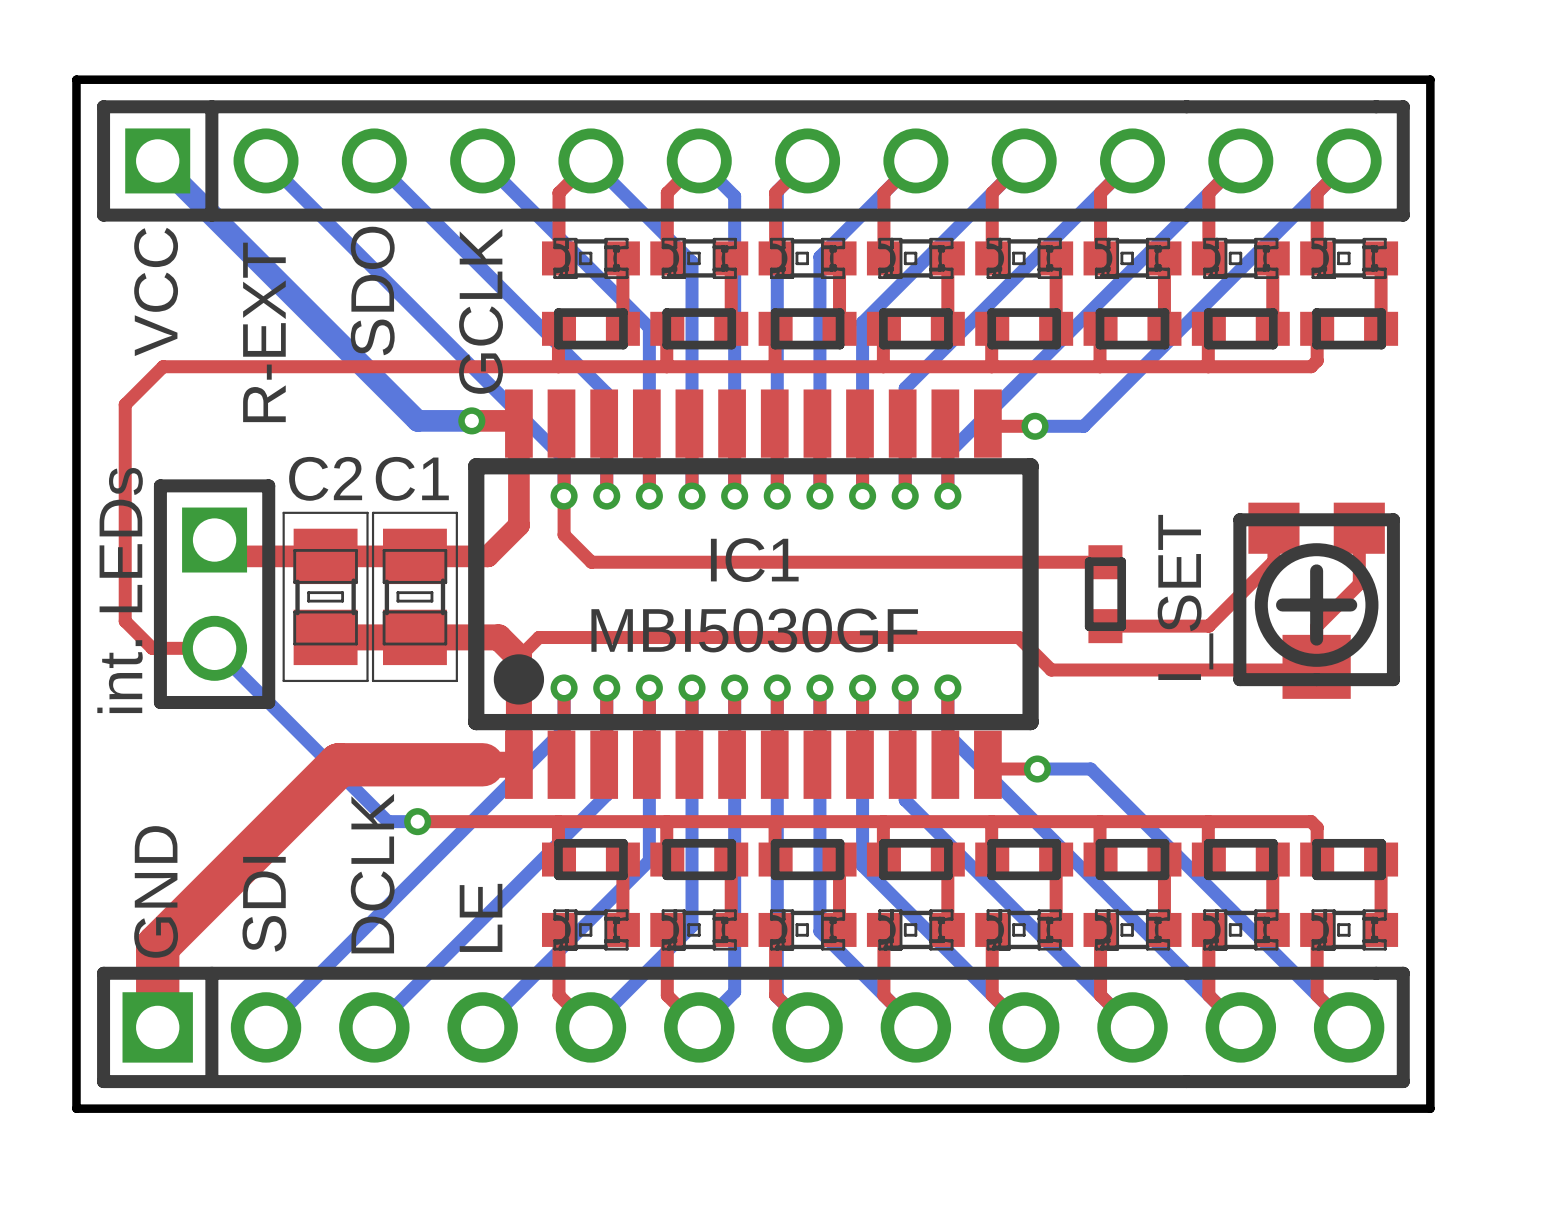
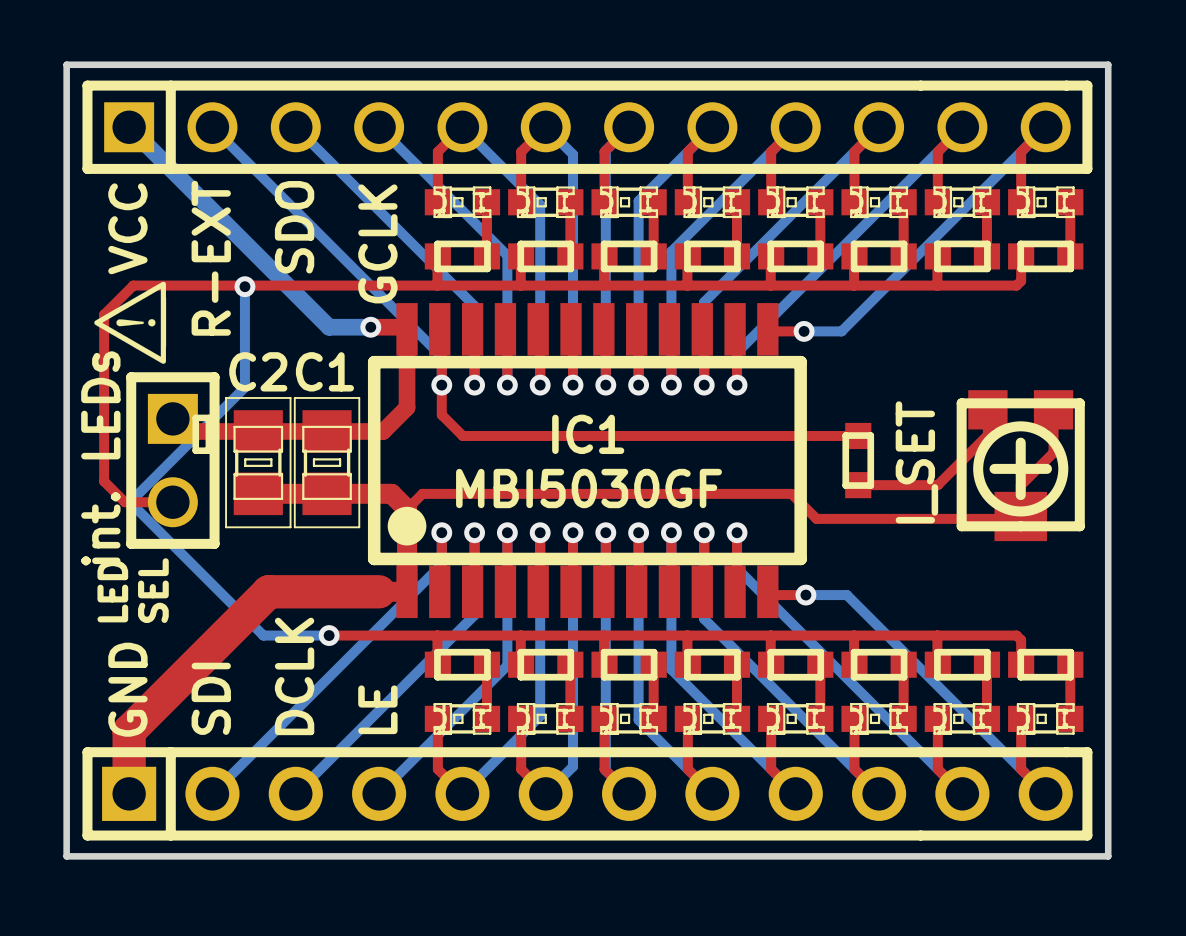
drawing: none -> [94, 281, 167, 364]
via: none -> (244, 286)
line: none -> (195, 417) (195, 450) (208, 450) (208, 417) (195, 417)
bottom track: (214, 648) (387, 821) -> (244, 286) (244, 387) (130, 502) (263, 635) (306, 635)
text: none -> LED (112, 591)
text: none -> SEL (153, 590)

